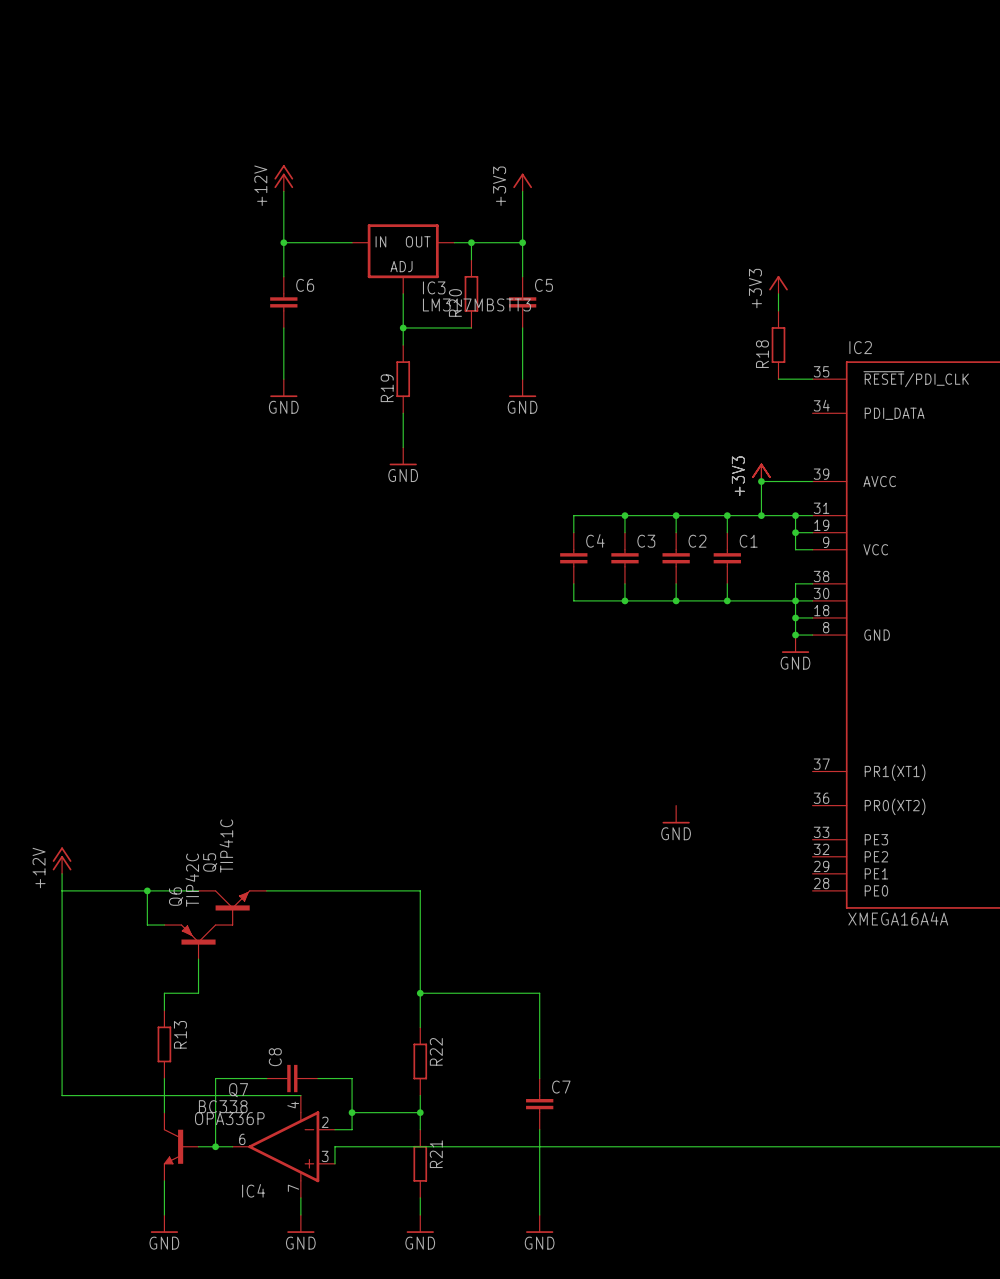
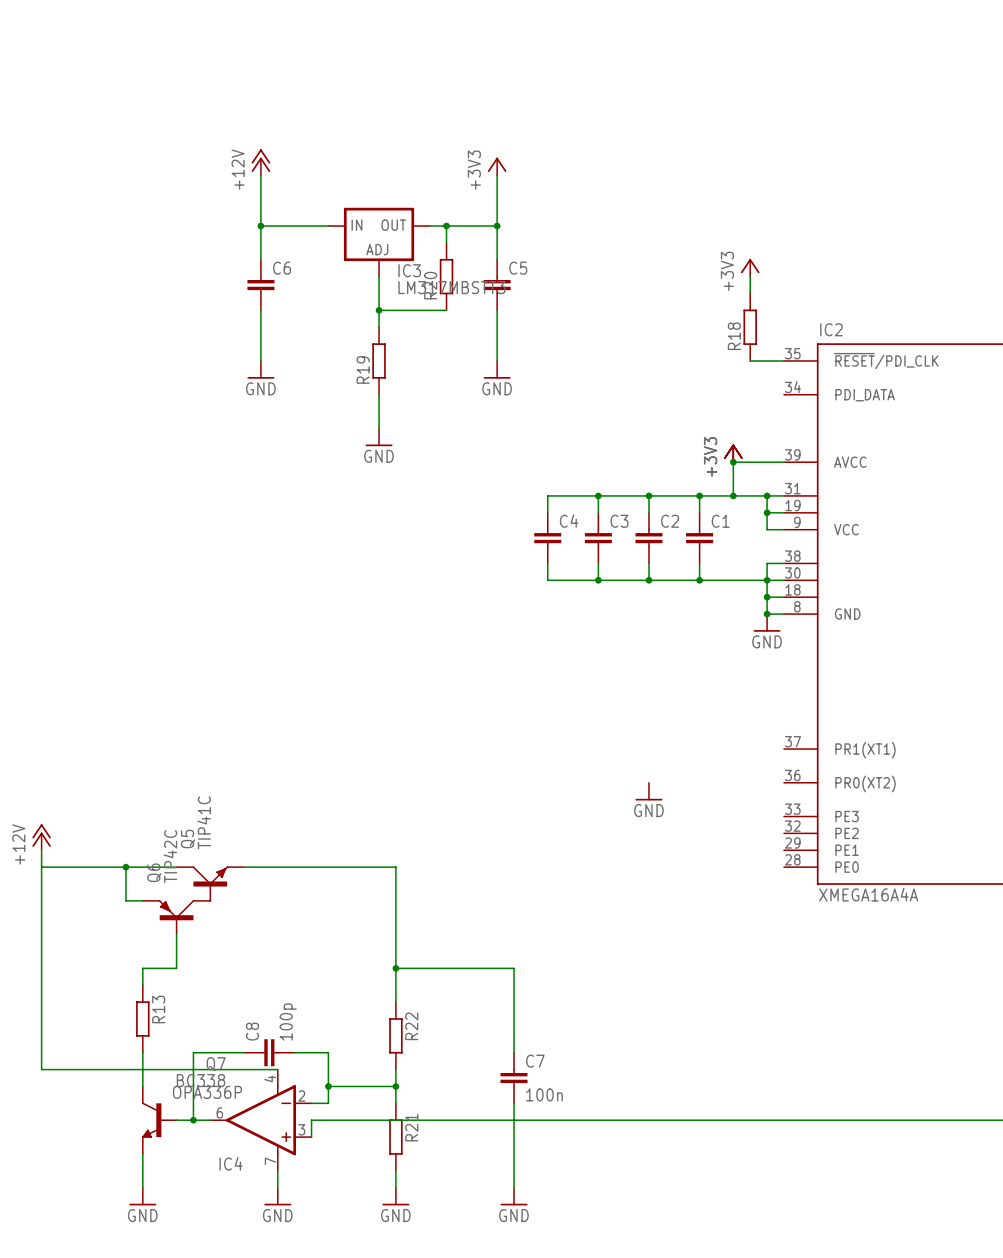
C8 value: none -> 100p (288, 1021)
C7 value: none -> 100n (544, 1094)

